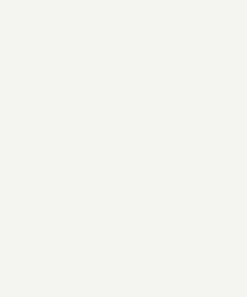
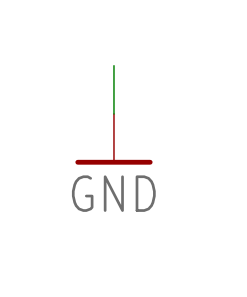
wire: none -> (113, 65) (113, 113)
power symbol: none -> GND (113, 139)

